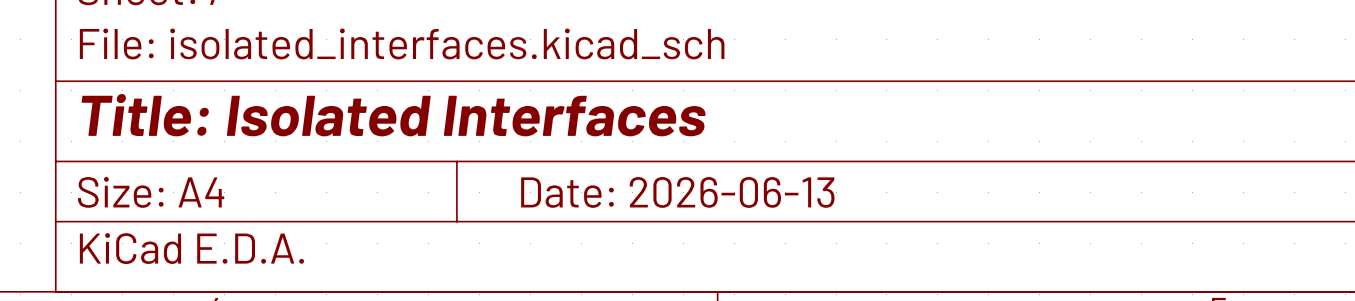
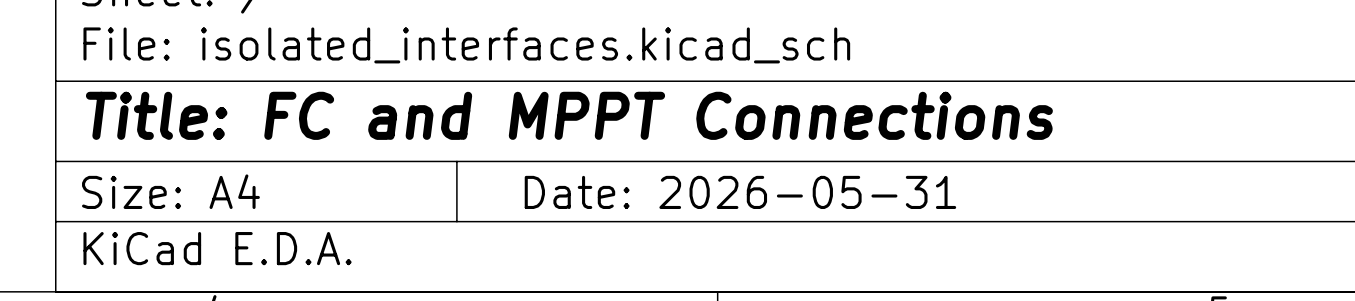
title block: Title: Isolated Interfaces (393, 115) -> Title: FC and MPPT Connections (569, 115)
title block: Date: 2026-06-13 (677, 192) -> Date: 2026-05-31 (740, 192)

